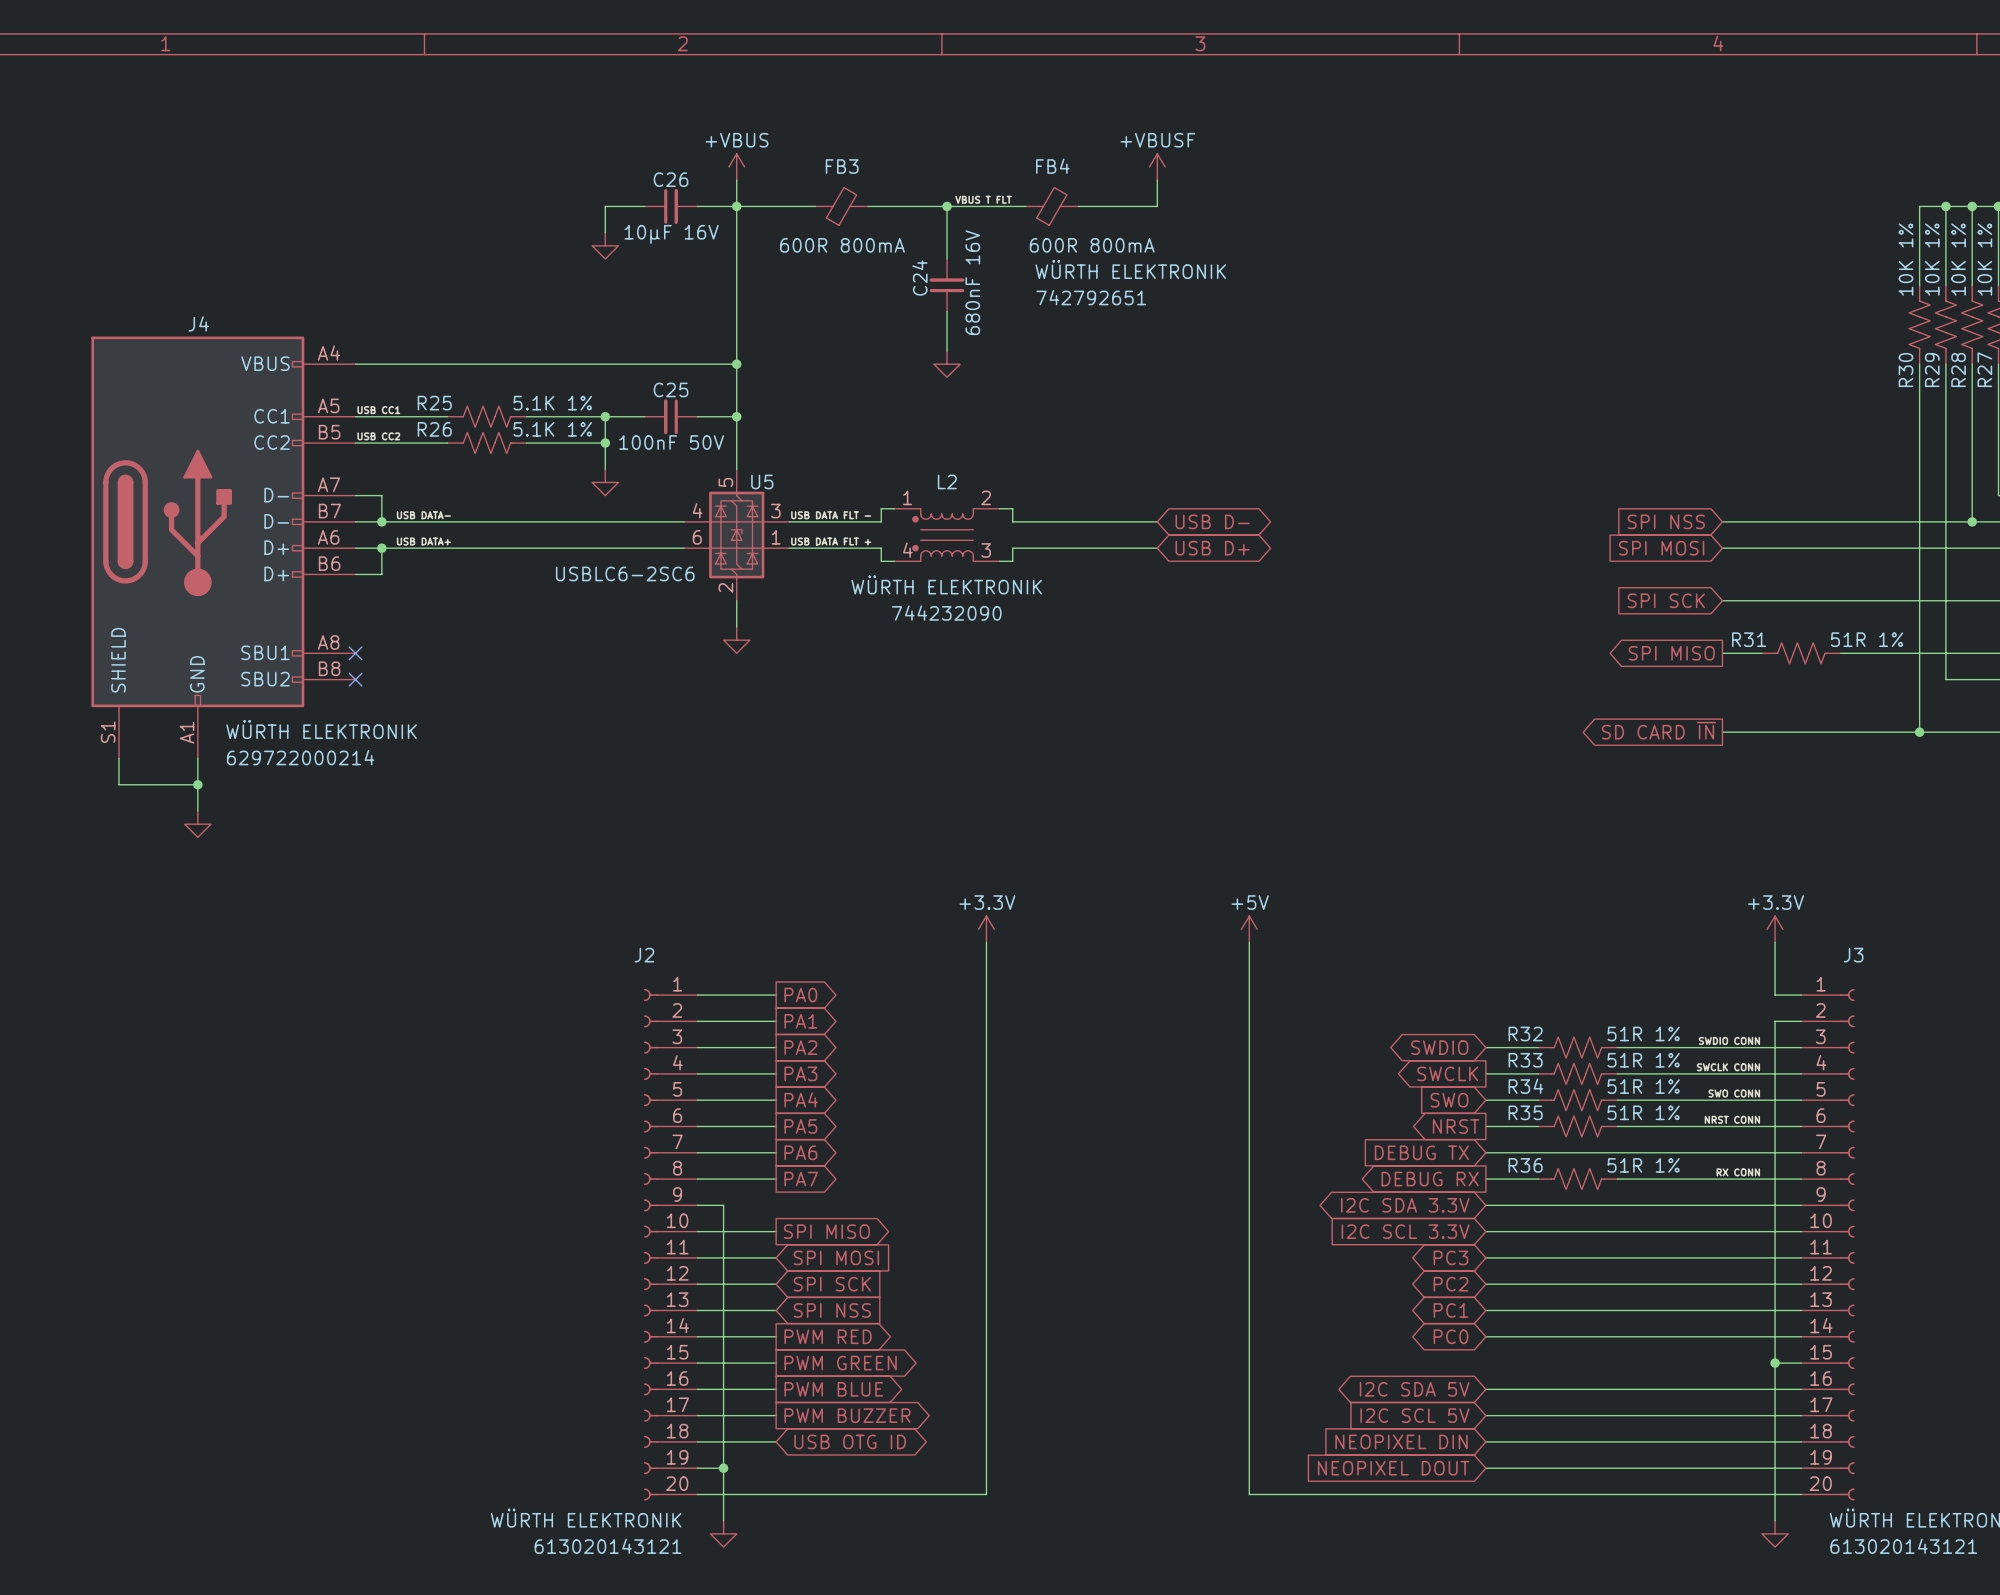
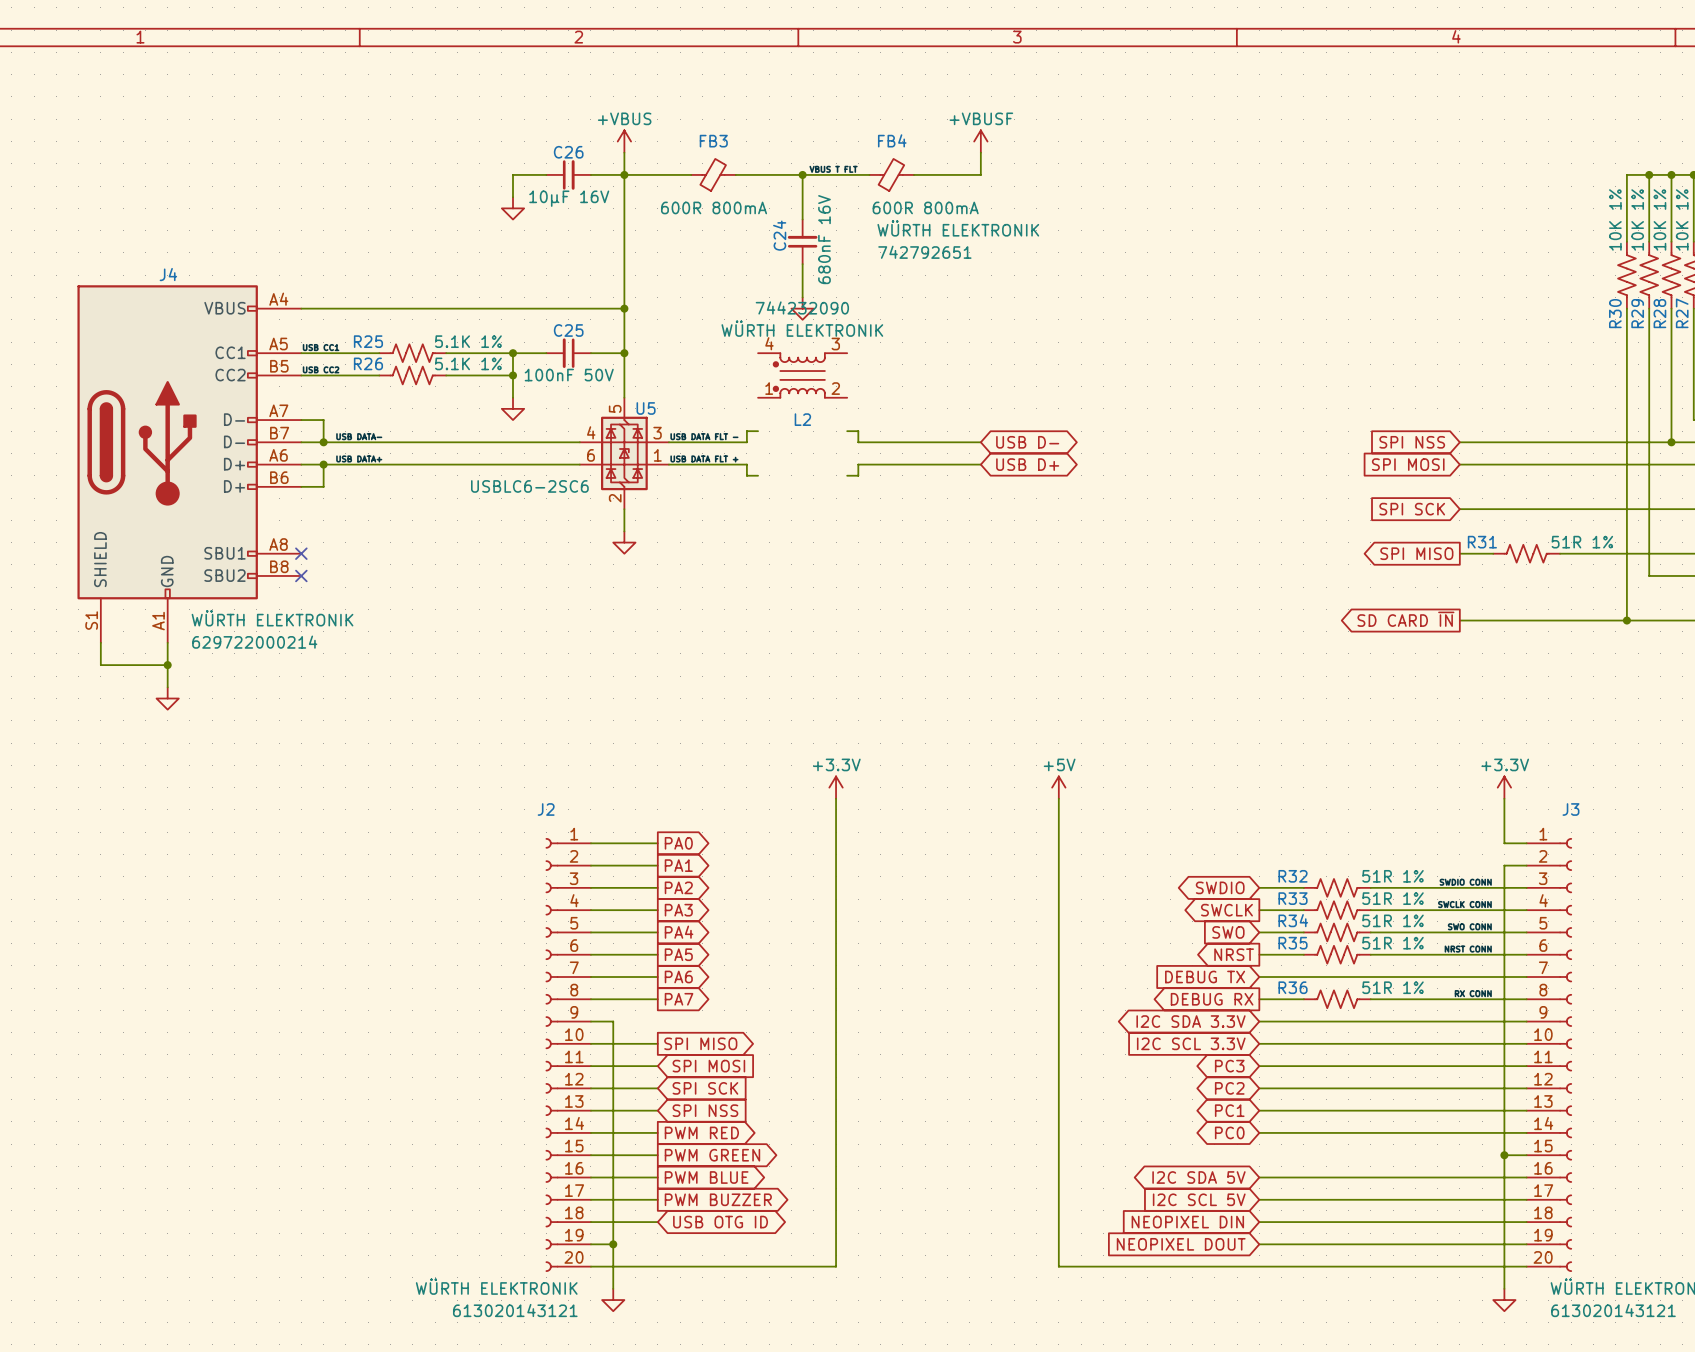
L2 flip: as is (943, 535) -> up-down (799, 375)
L2 position: (947, 535) -> (802, 375)

